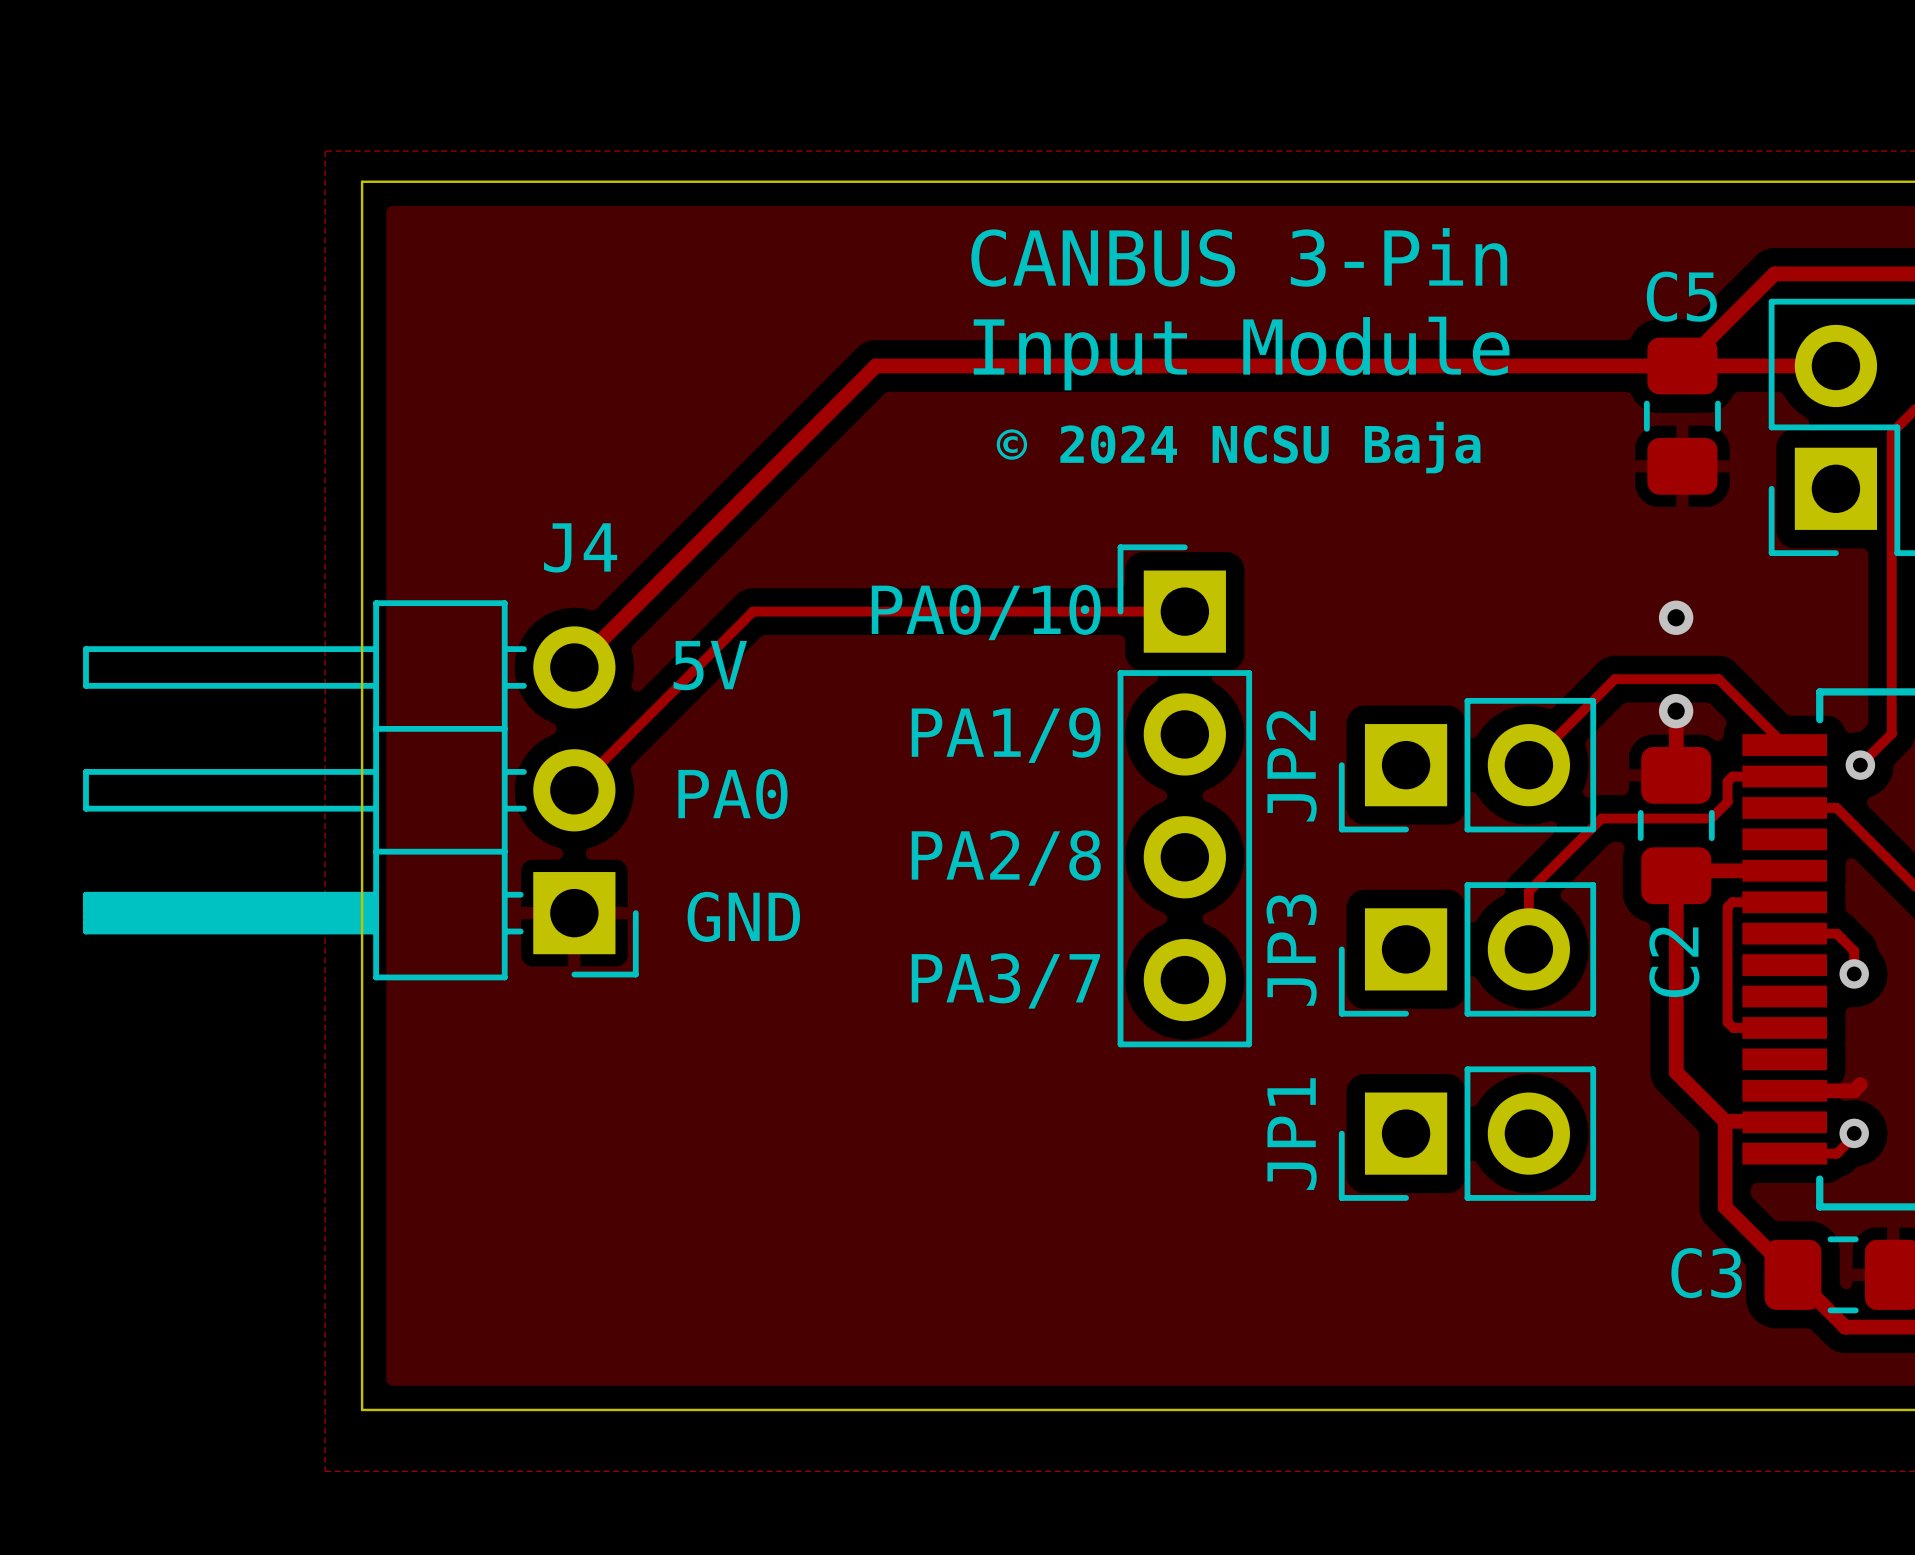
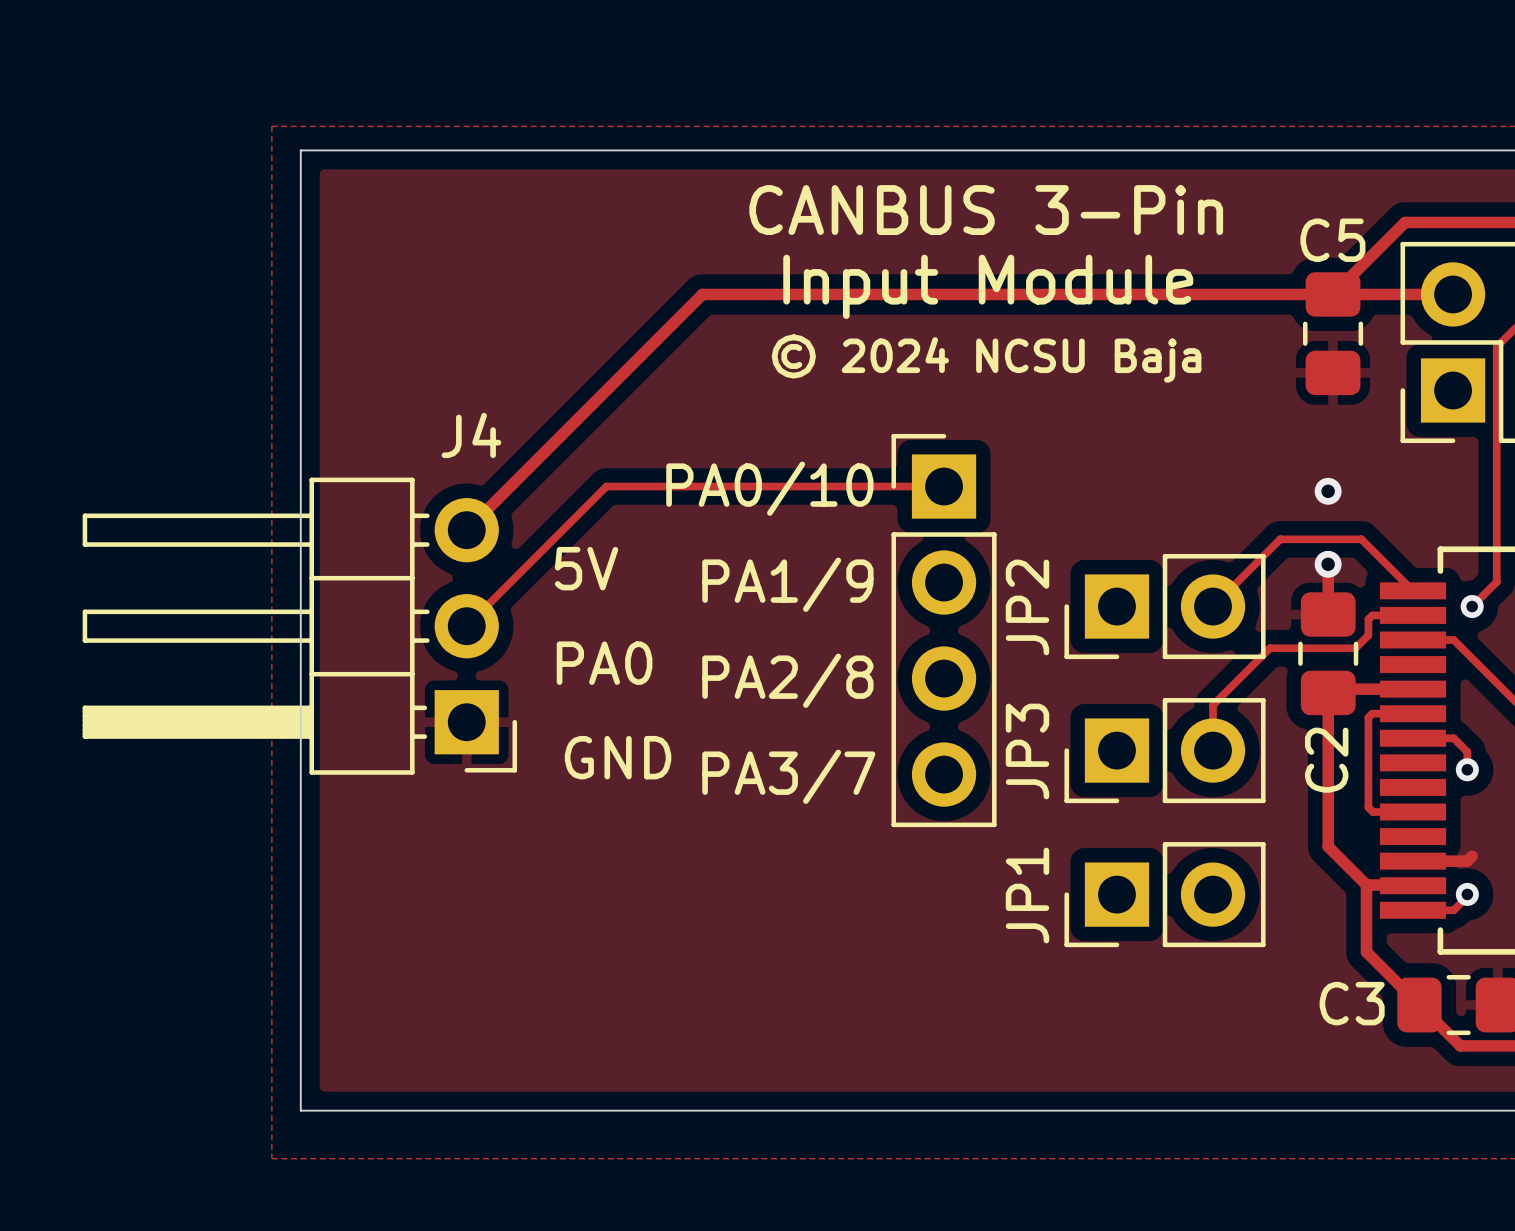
text position: 5V (710, 665) -> 5V (586, 568)
text position: PA0 (732, 794) -> PA0 (604, 663)
text position: GND (743, 916) -> GND (618, 757)

